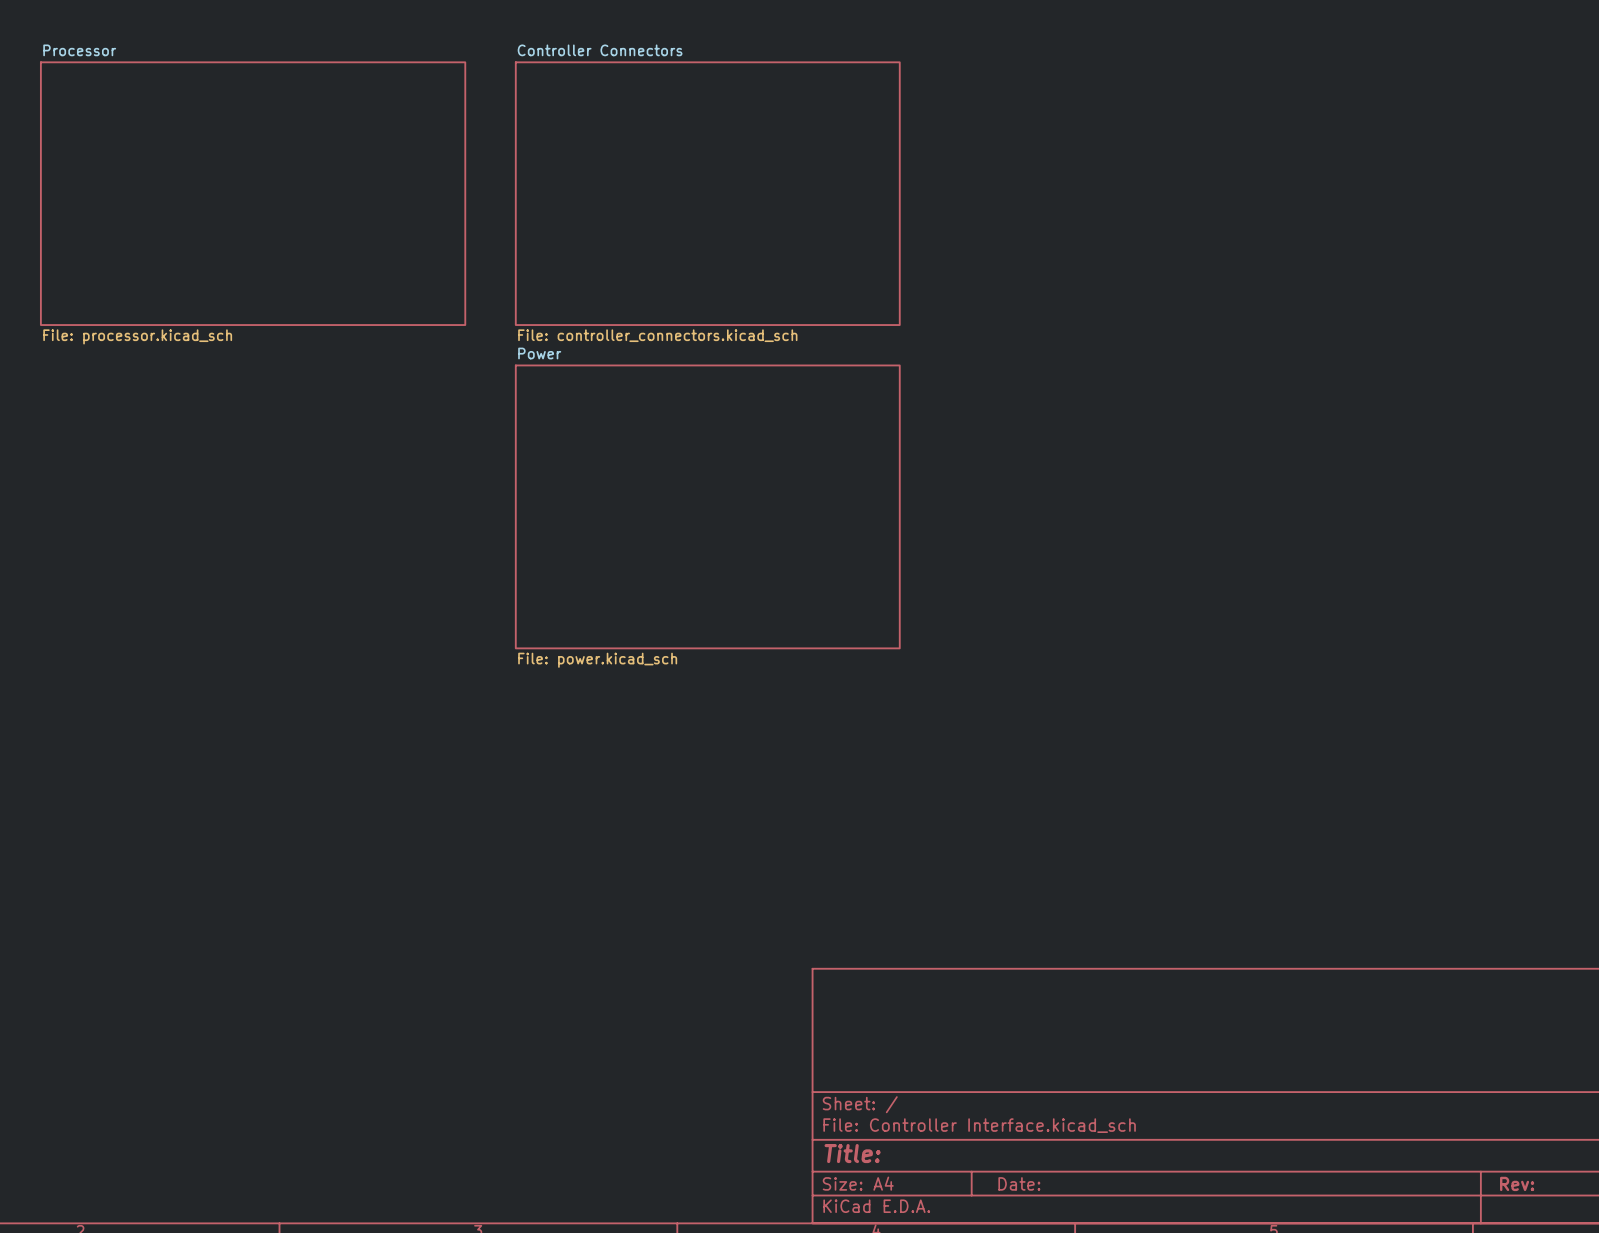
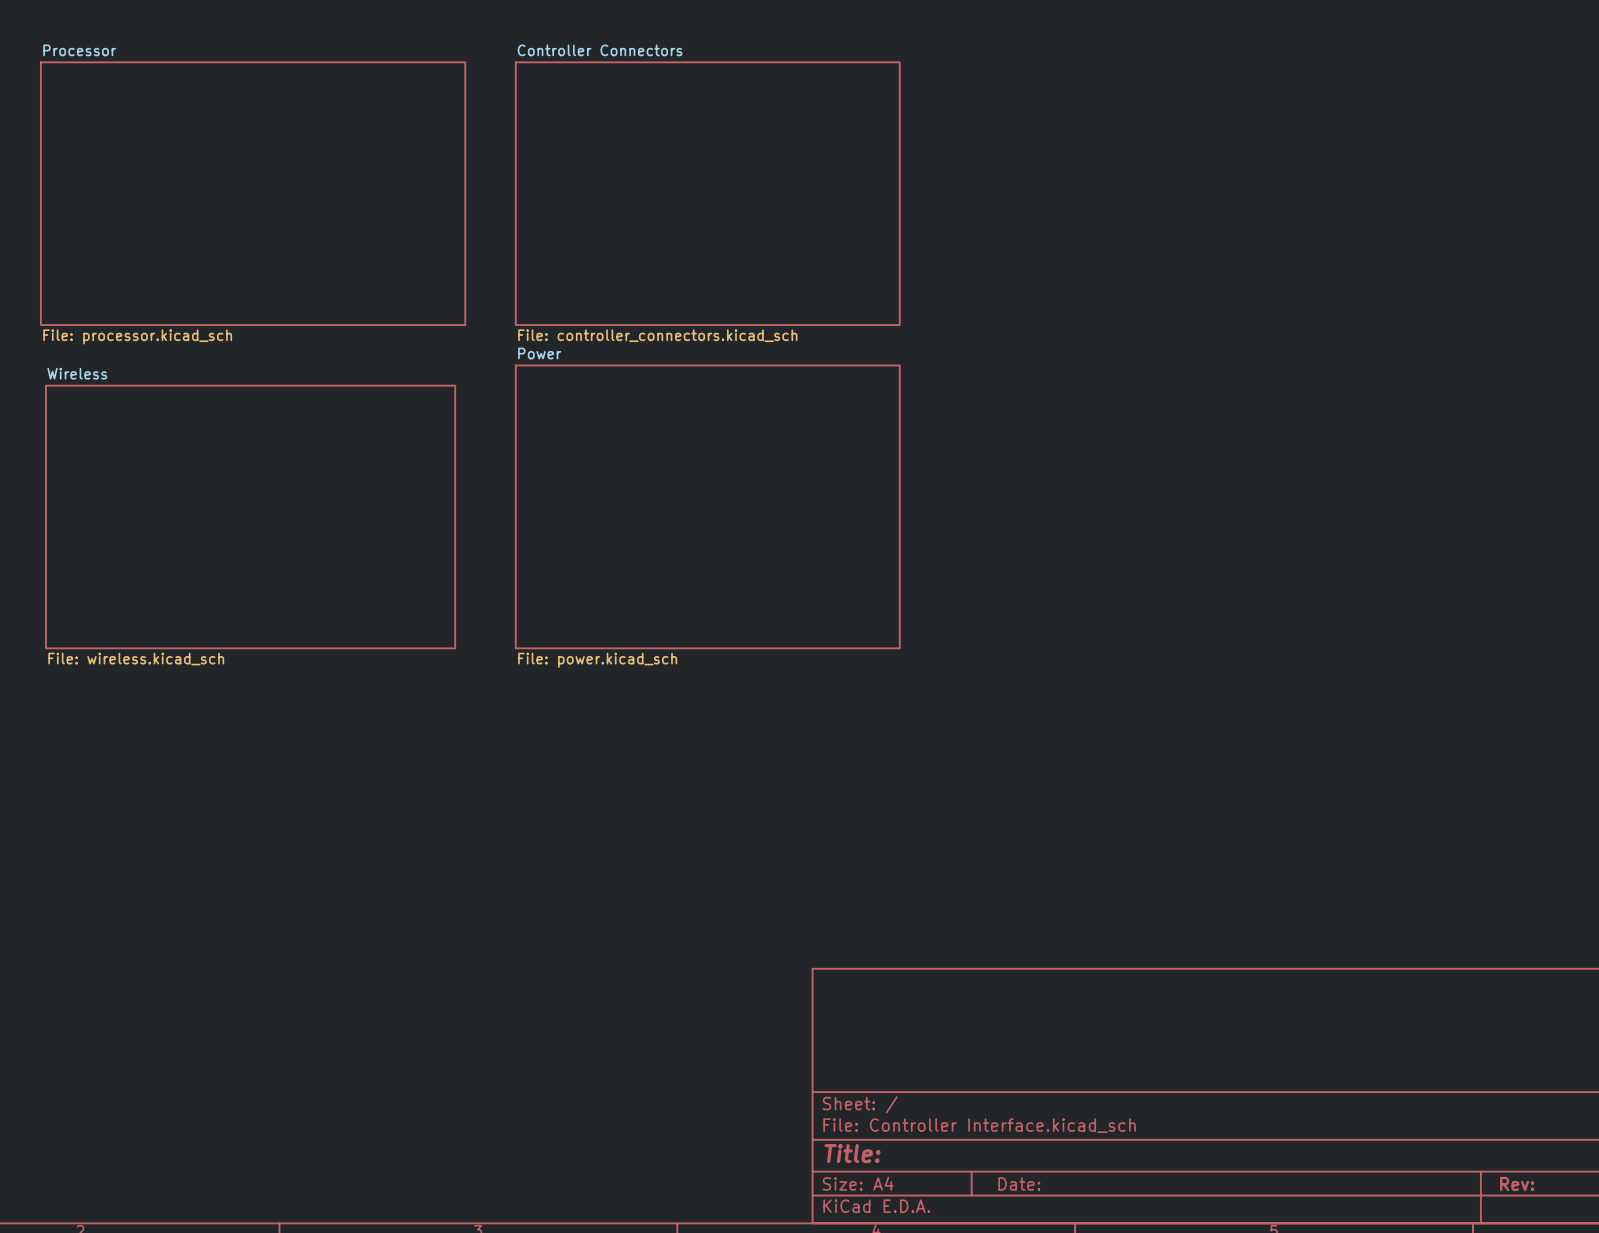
sheet Wireless: none -> File: wireless.kicad_sch (250, 517)

